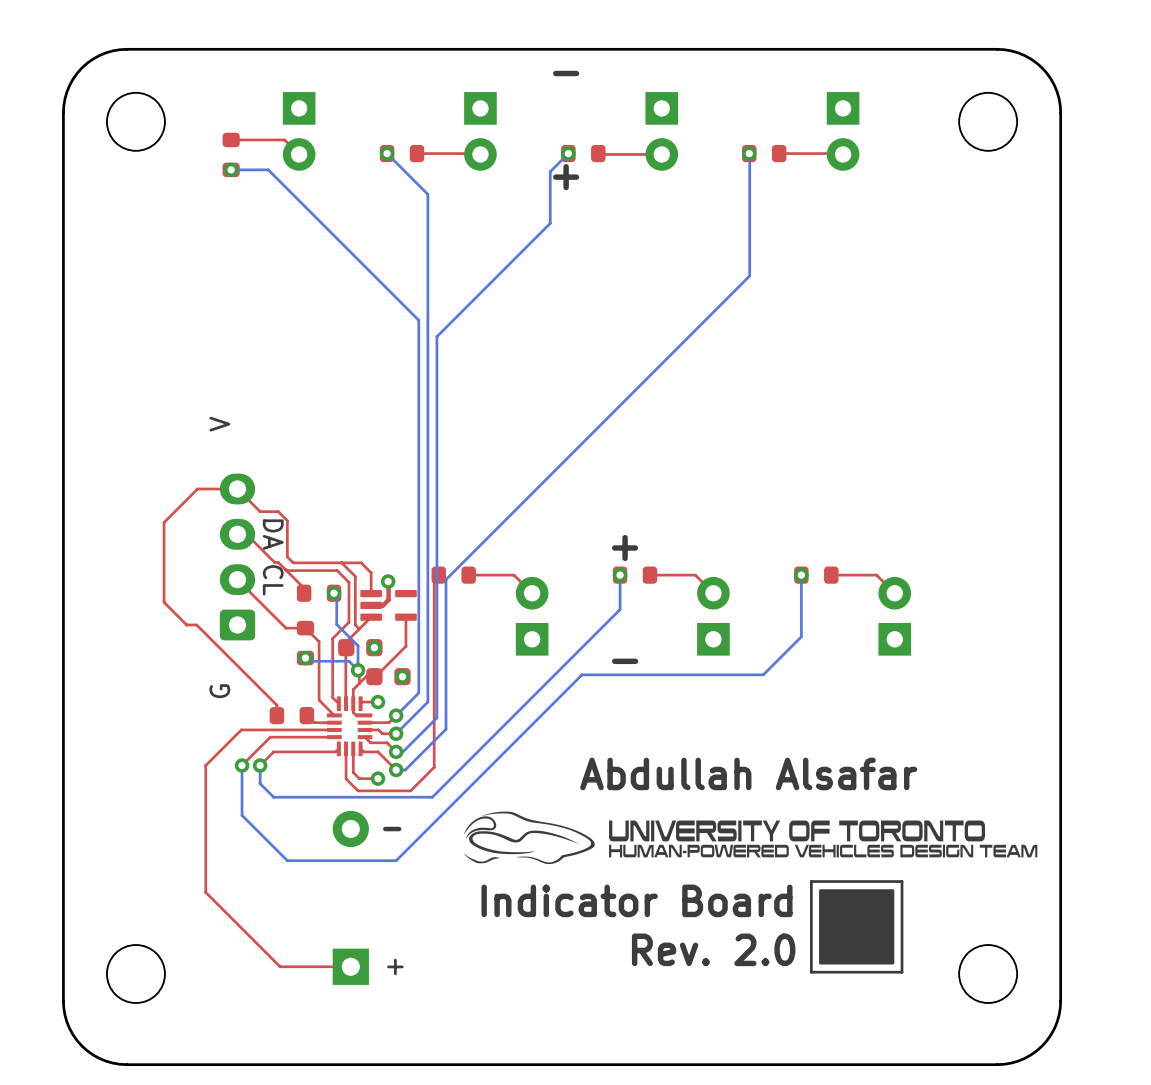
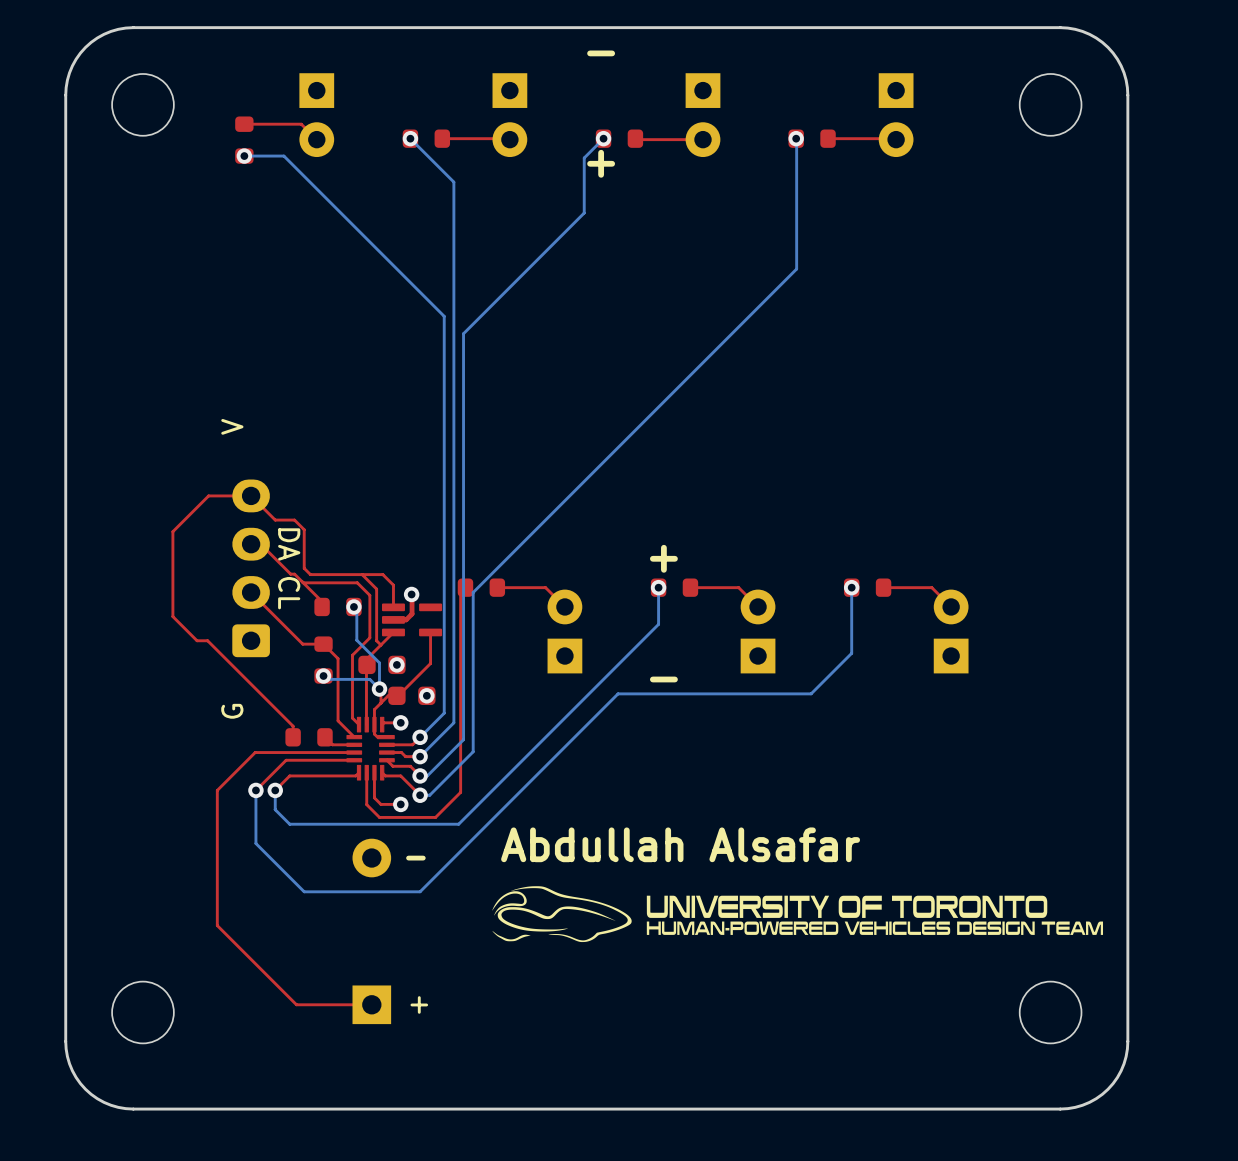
text position: Abdullah Alsafar (748, 773) -> Abdullah Alsafar (680, 844)
drawing position: (750, 837) -> (797, 914)
line: (902, 881) (811, 881) (811, 972) (902, 972) (902, 881) -> none
drawing: [819, 889, 895, 965] -> none
text: Indicator Board (636, 900) -> none
text: Rev. 2.0 (713, 949) -> none

